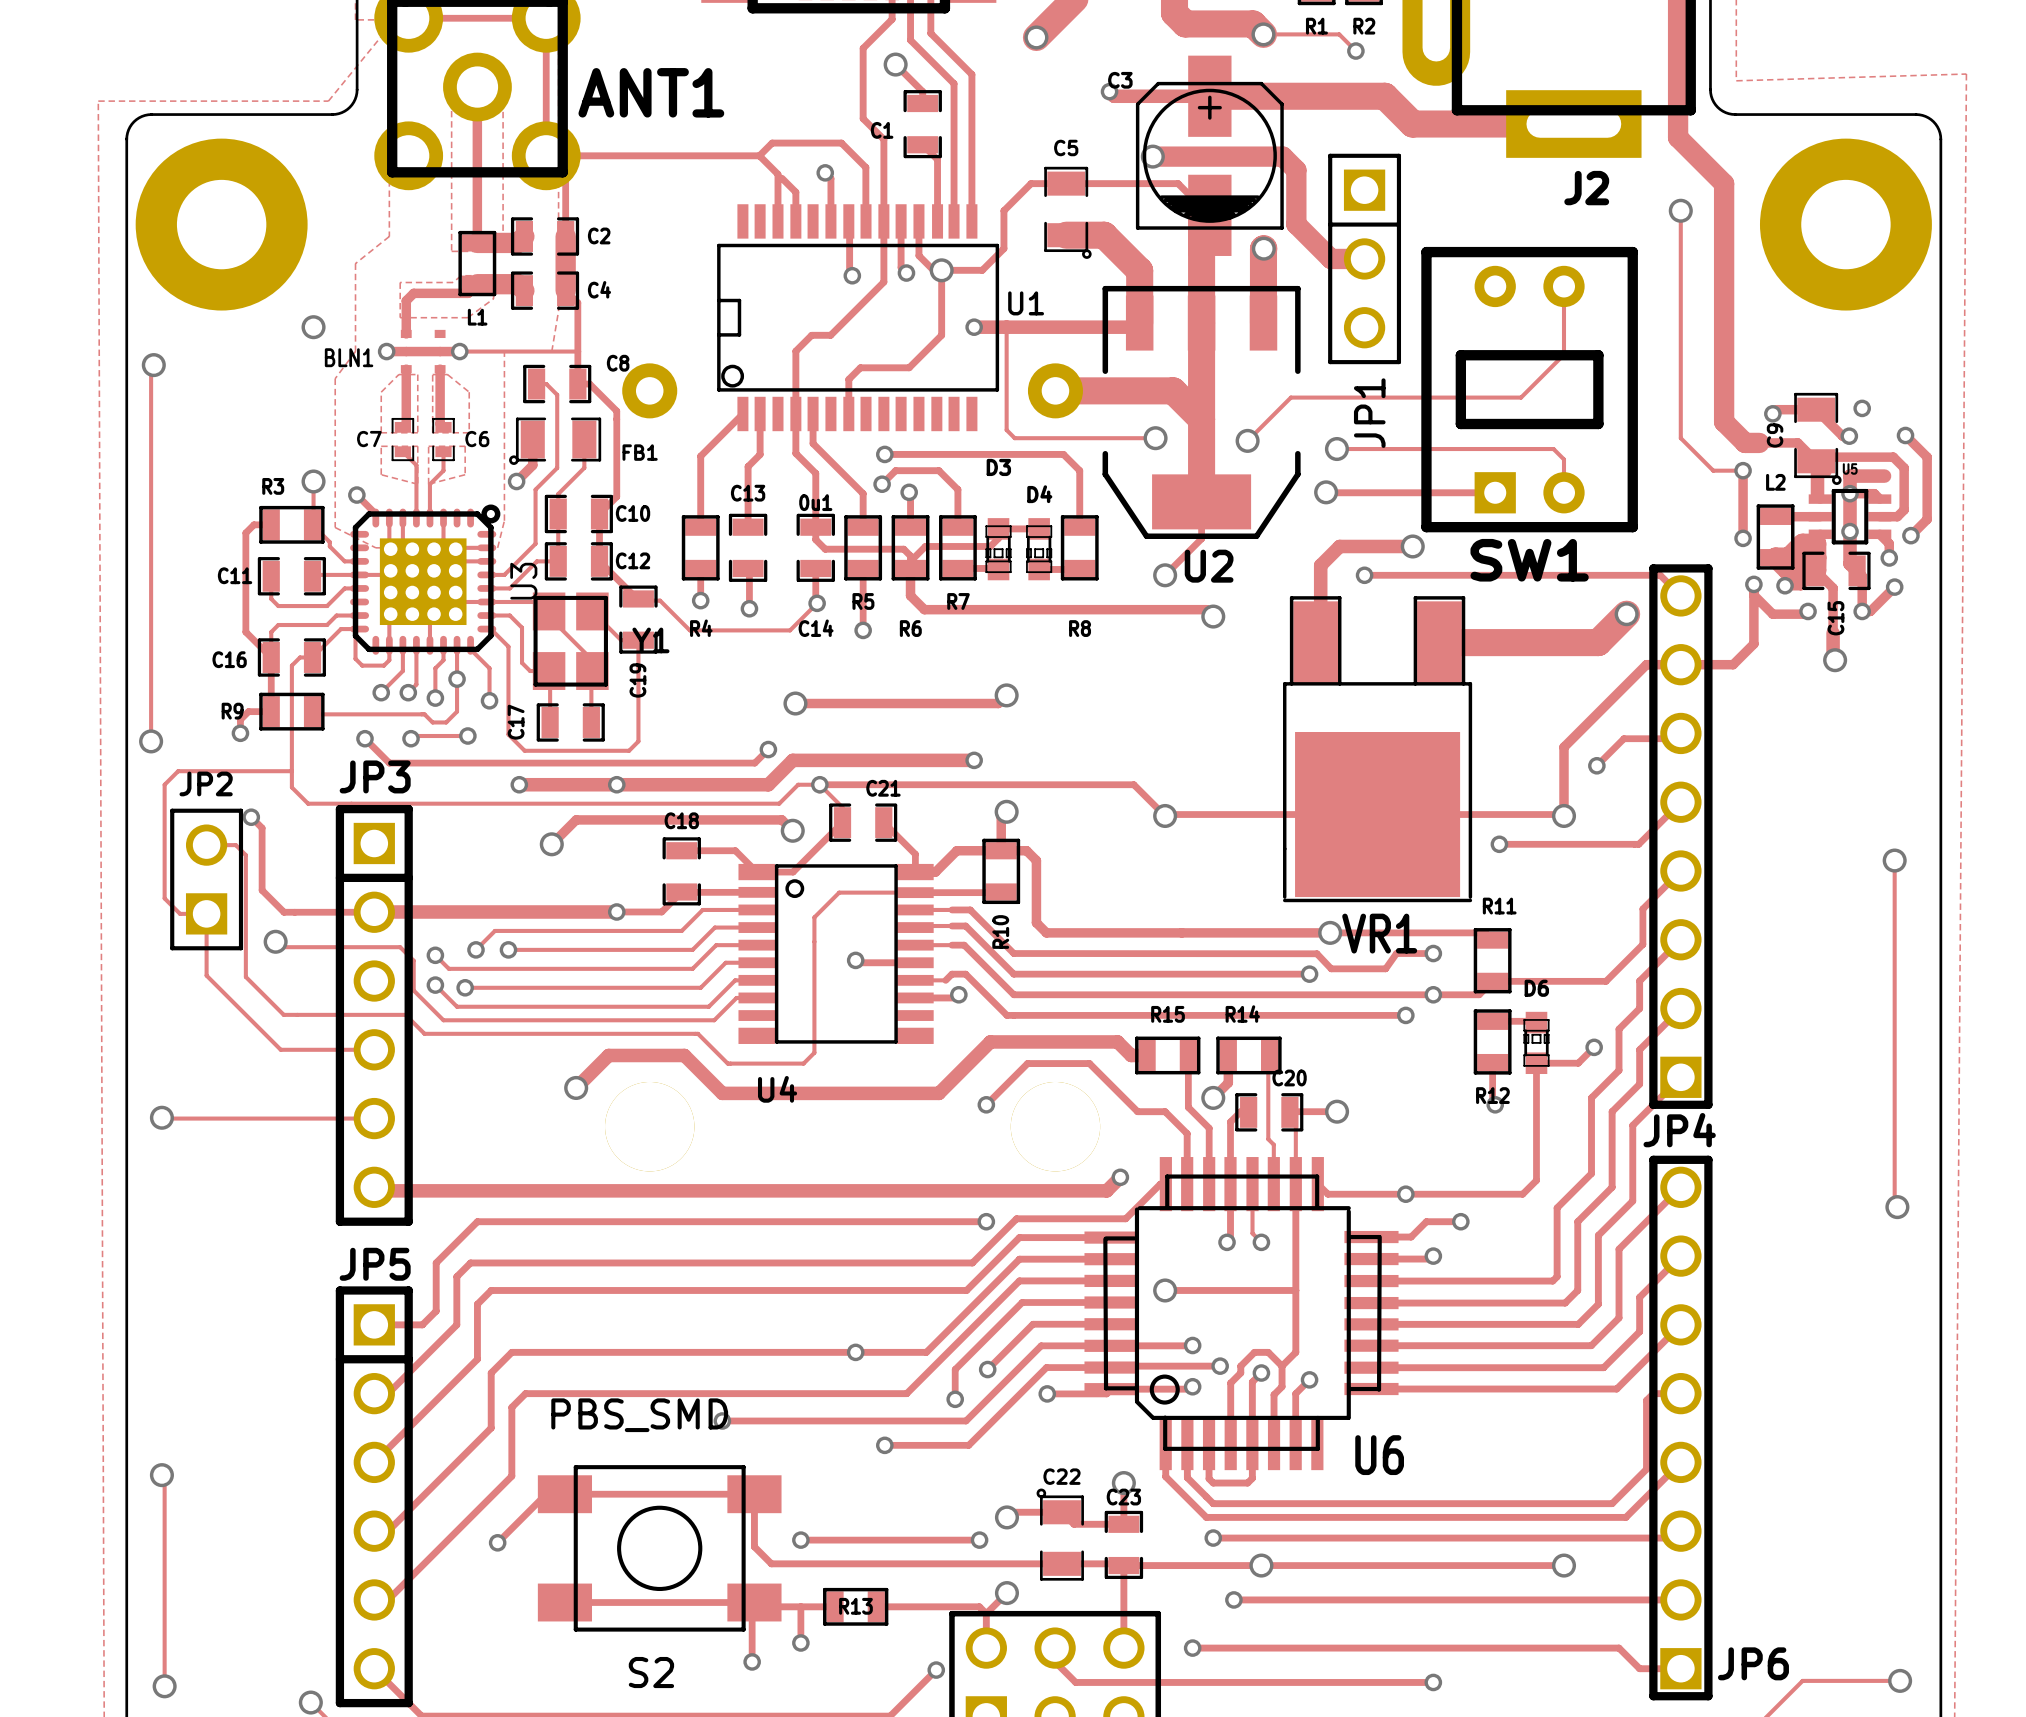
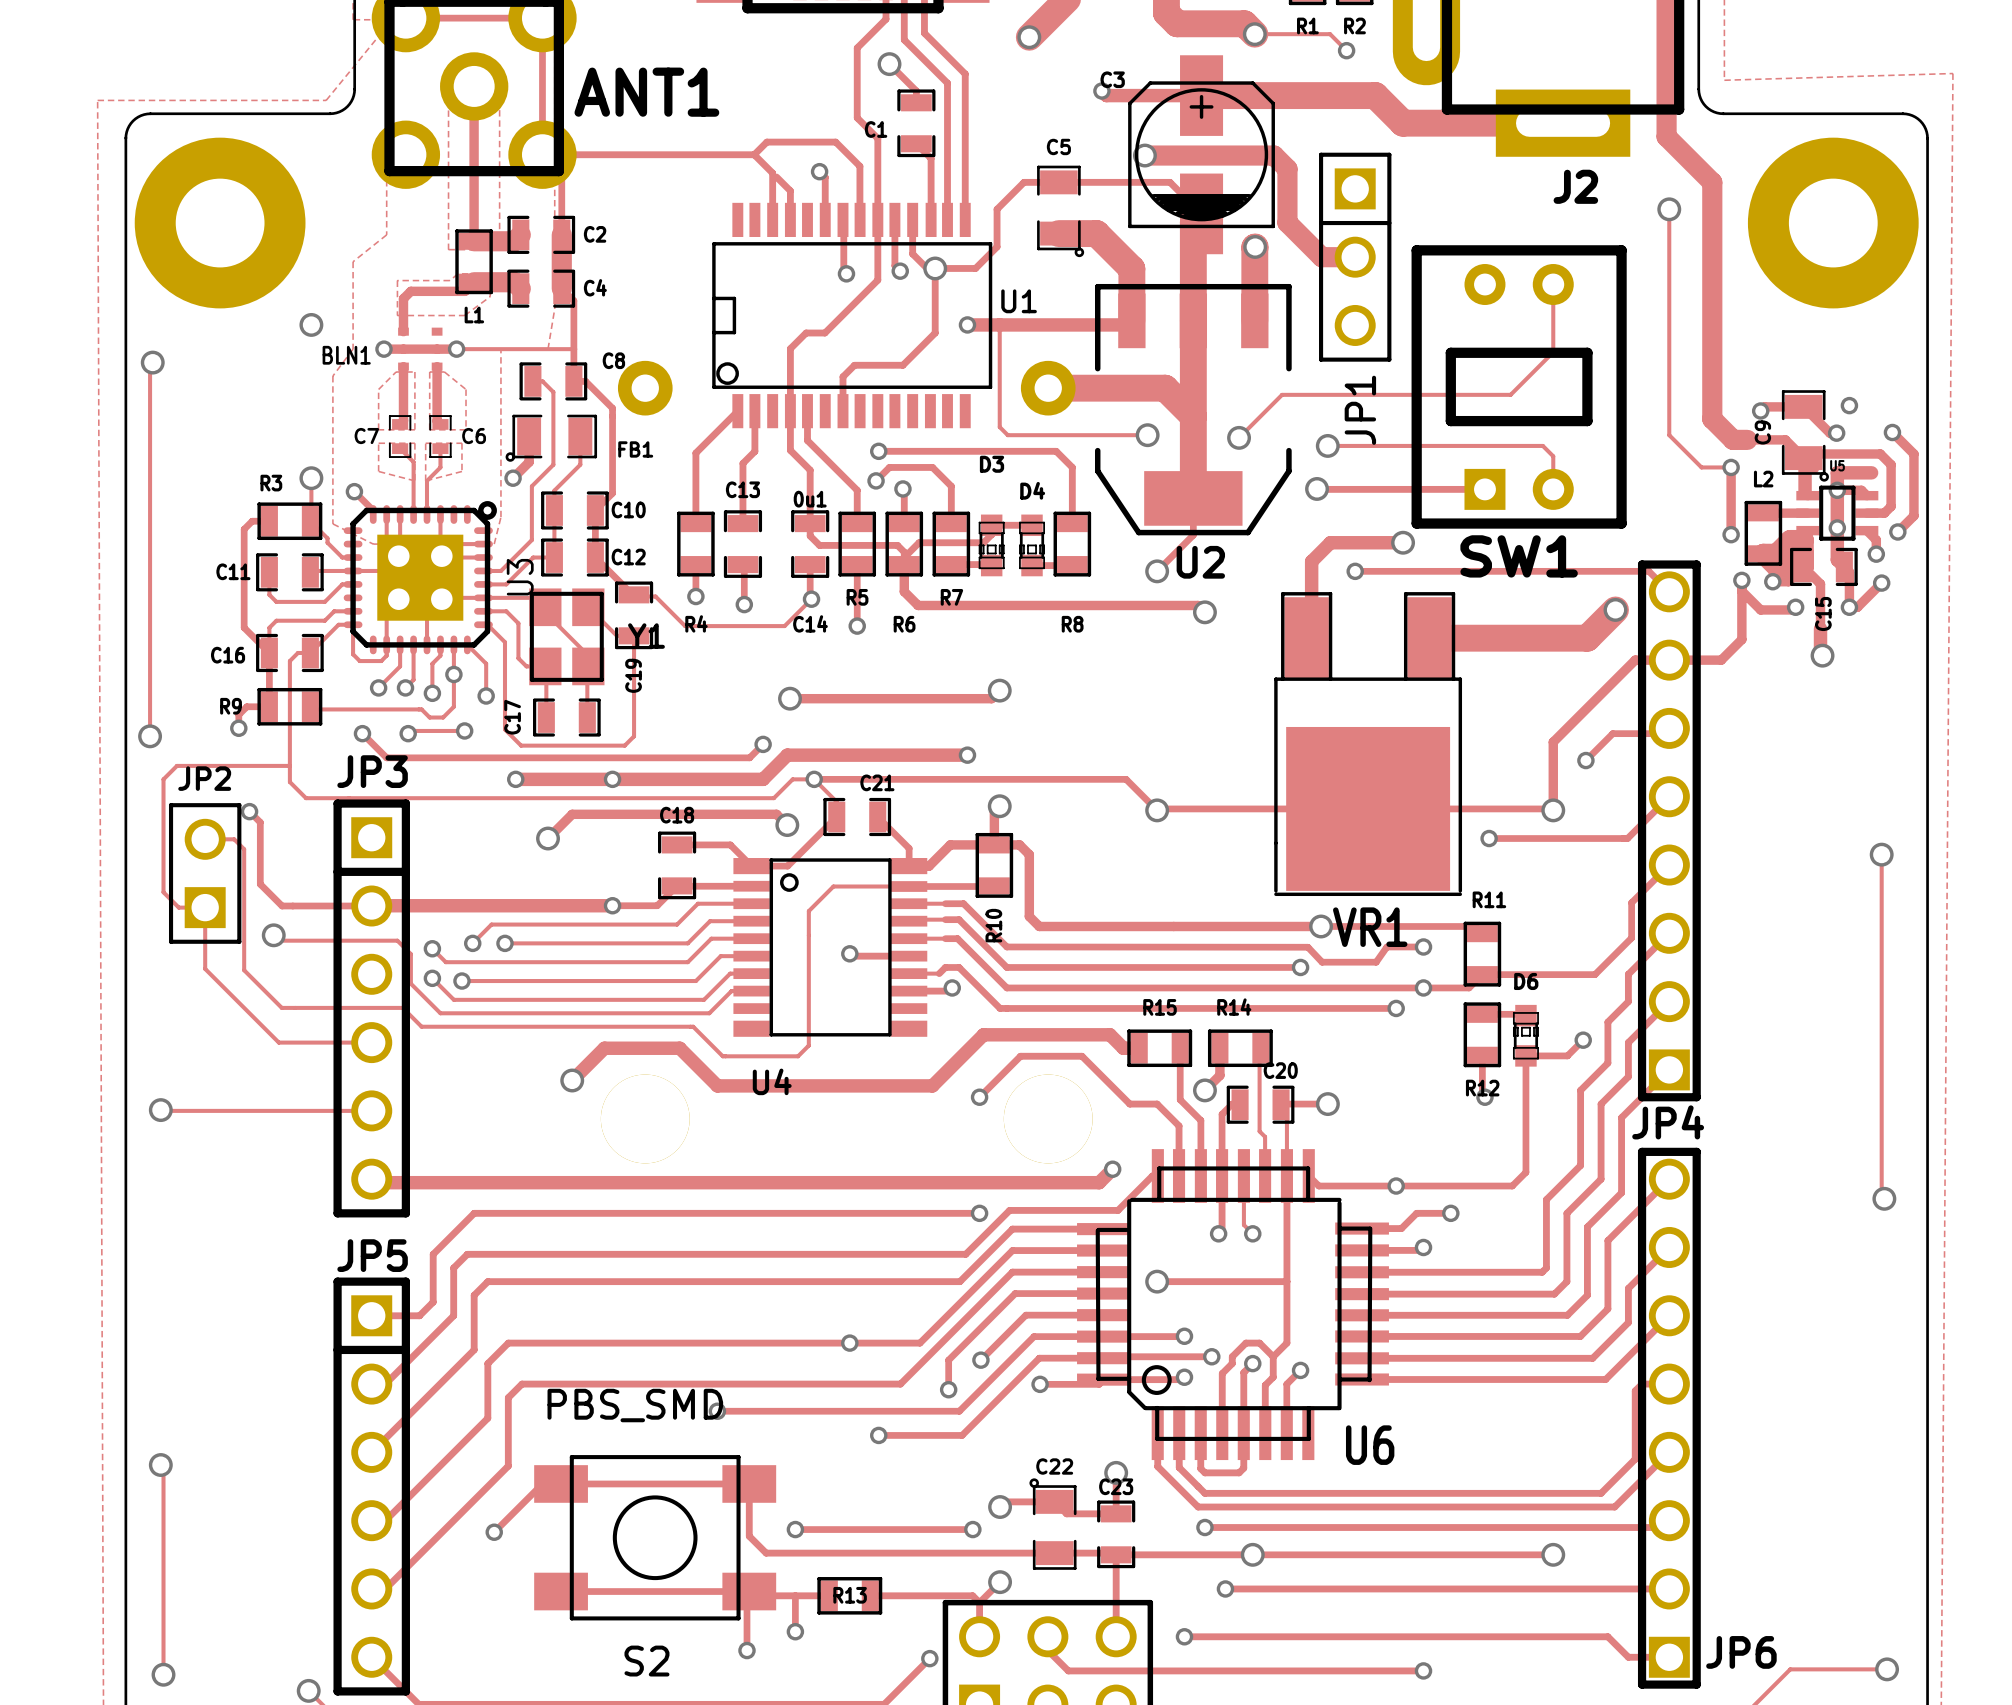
U3 footprint: [350, 504, 501, 655] -> [343, 501, 497, 655]

